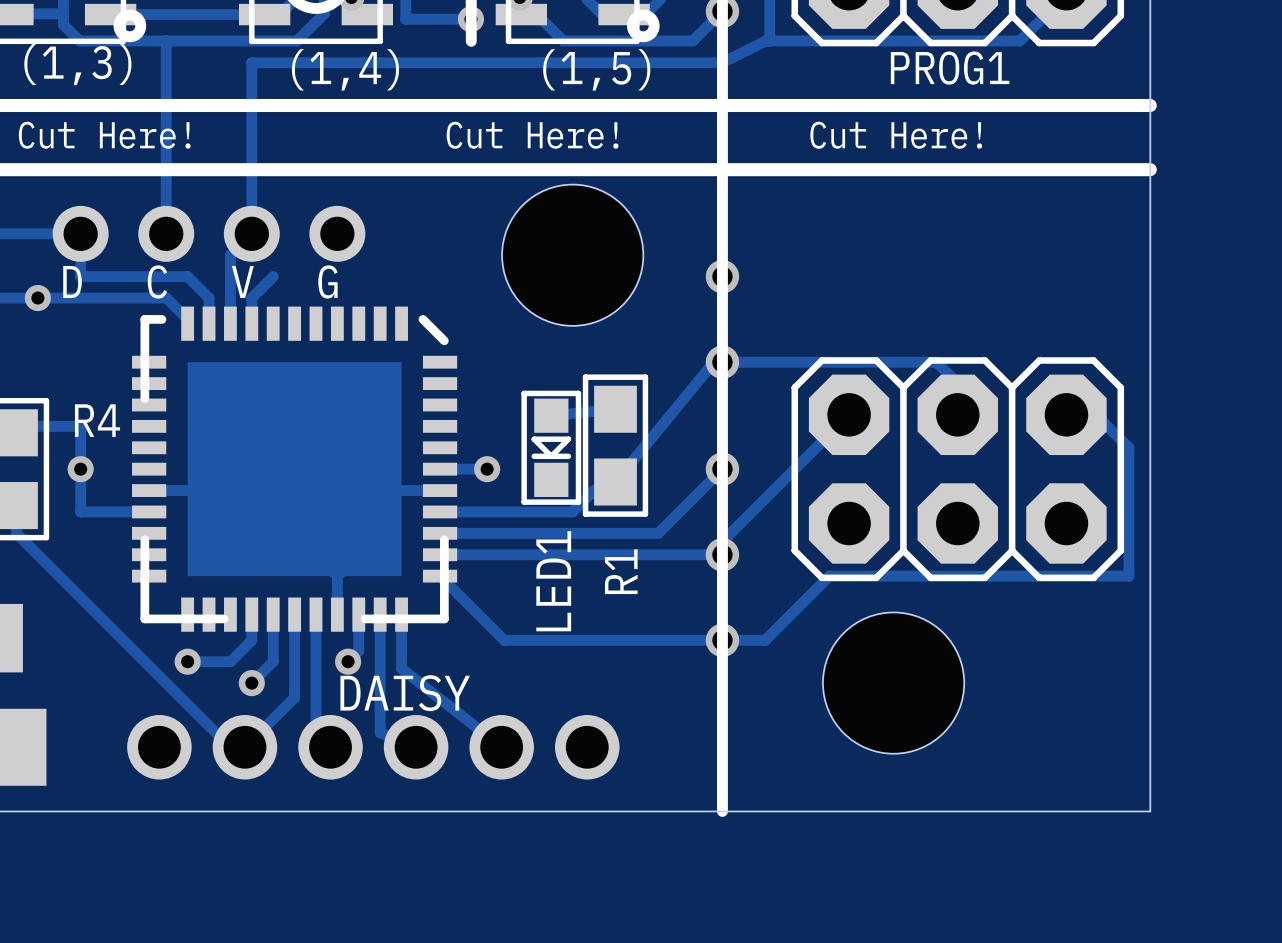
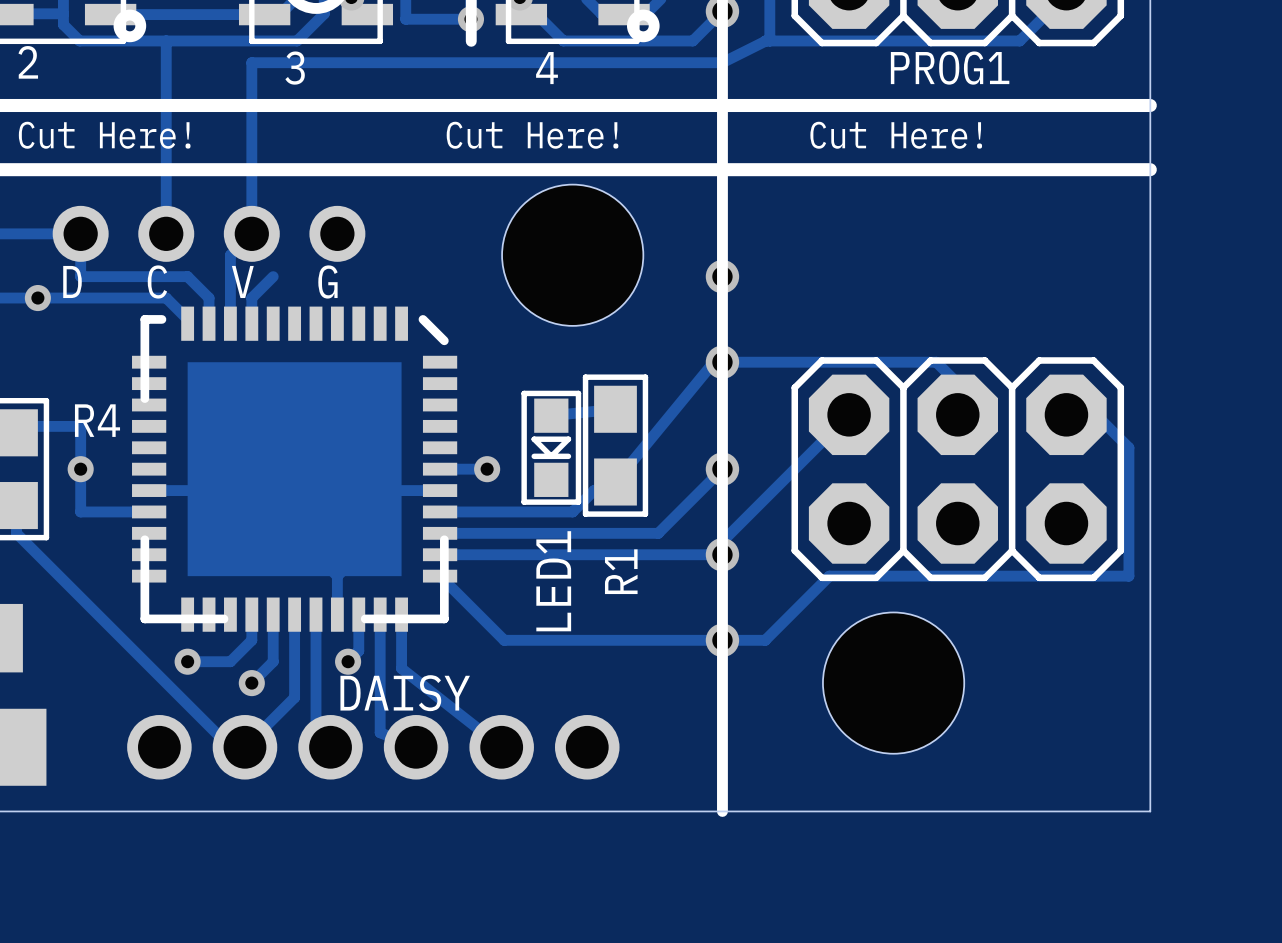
(1,3) name: (1,3) (77, 64) -> 2 (28, 62)
(1,4) name: (1,4) (345, 69) -> 3 (295, 68)
(1,5) name: (1,5) (596, 69) -> 4 (547, 68)

